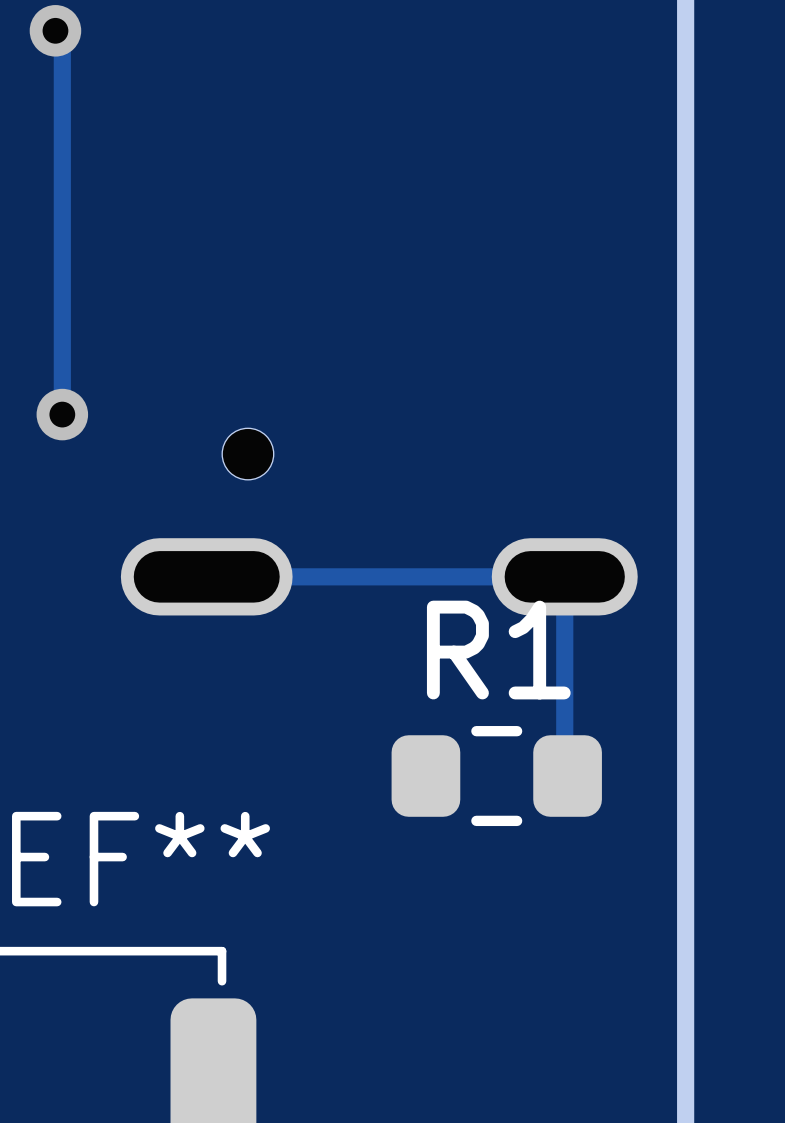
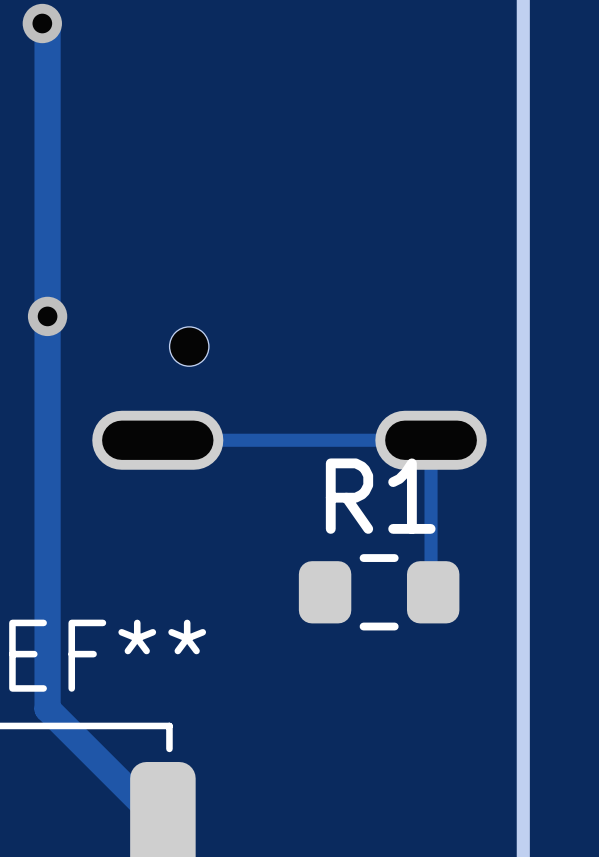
track width: thin (55, 30) (62, 37) (62, 414) -> thick (42, 23) (47, 28) (47, 316)
track: none -> (47, 316) (47, 708) (162, 824)

